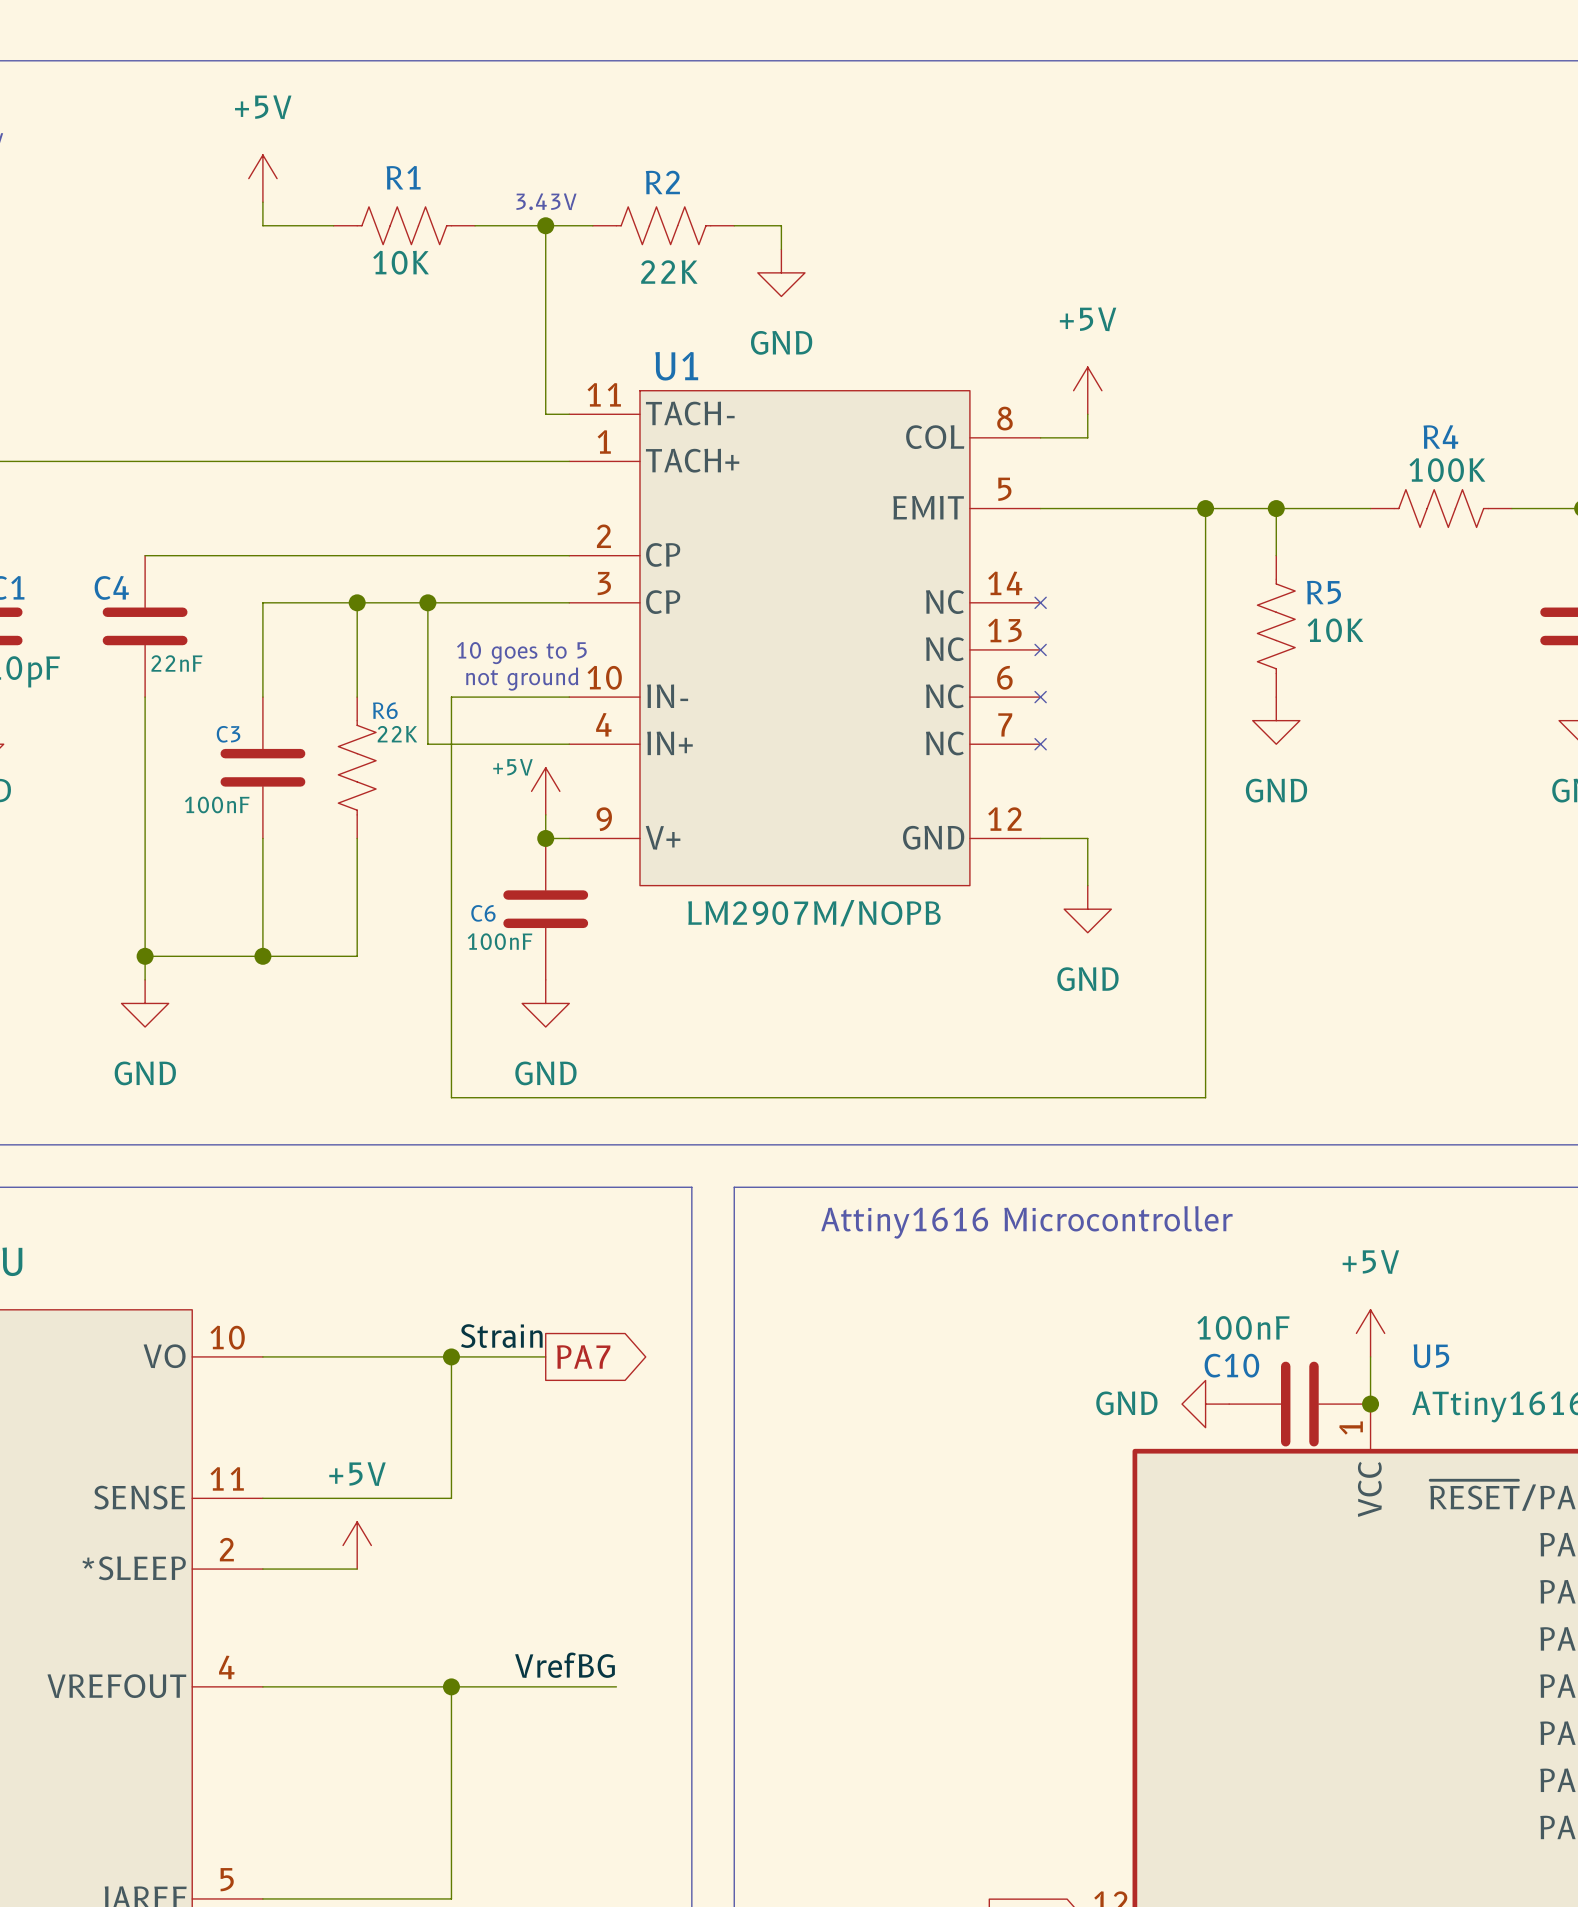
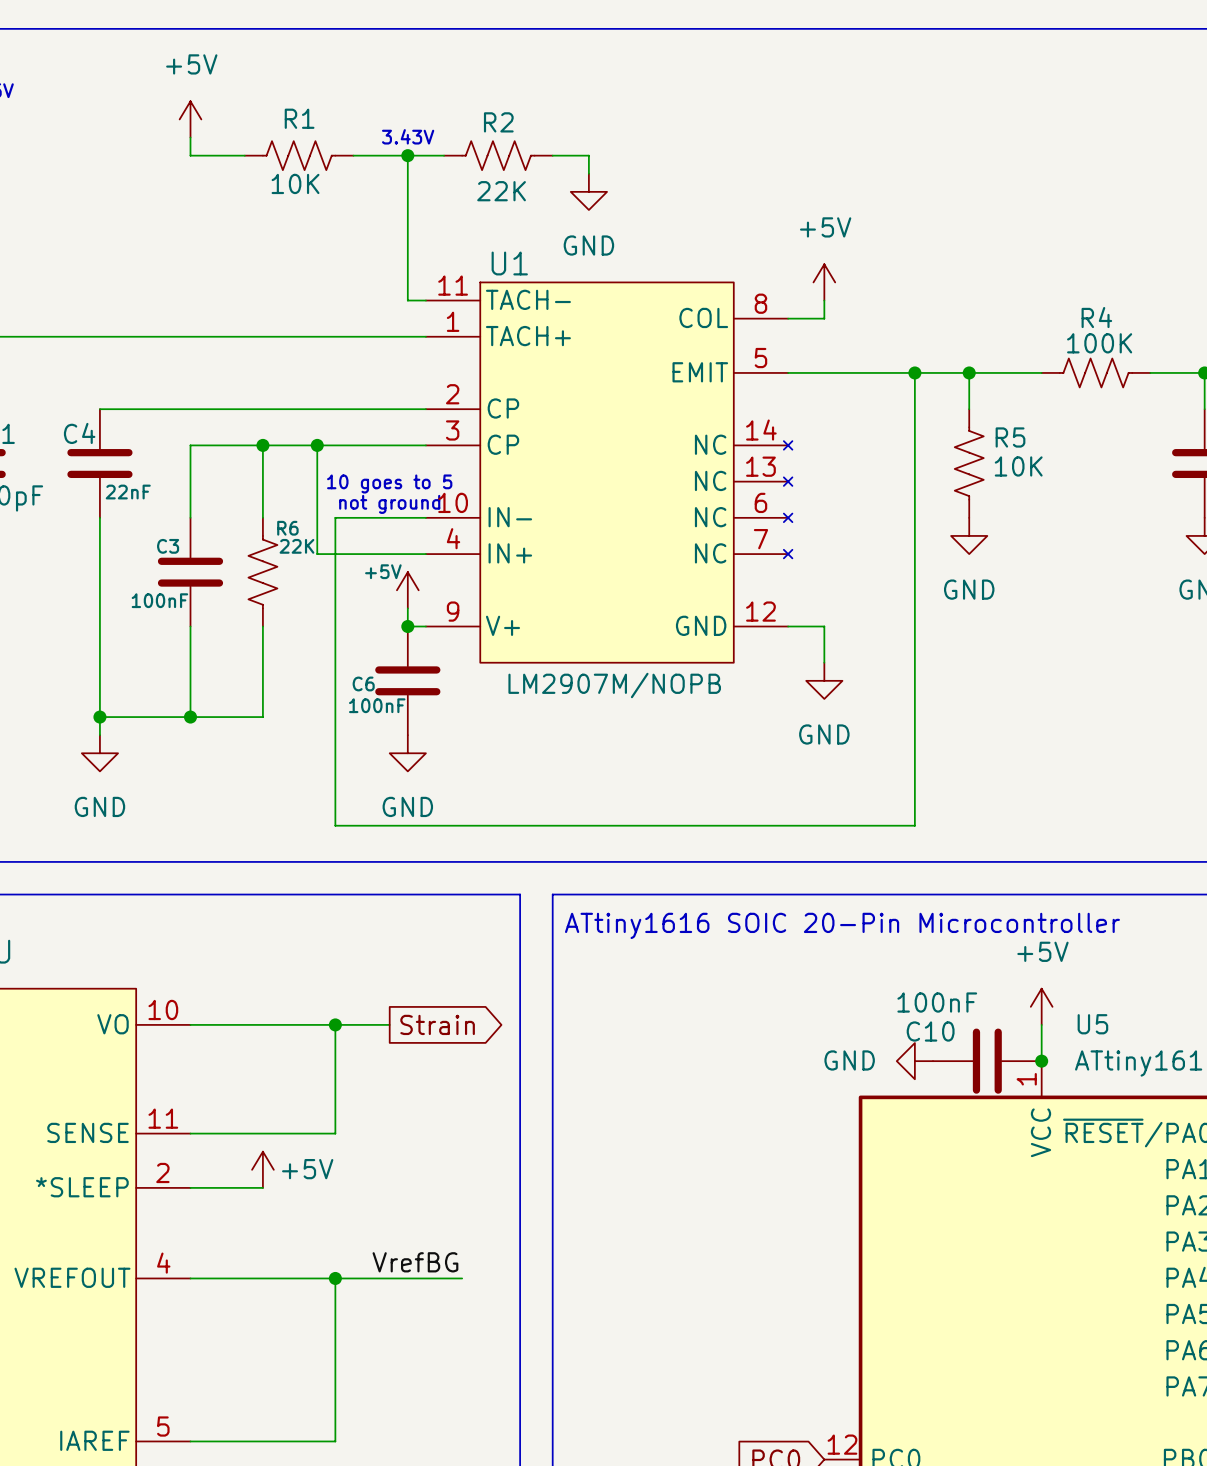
text: Attiny1616 Microcontroller (1026, 1222) -> ATtiny1616 SOIC 20-Pin Microcontroller (842, 925)
label: Strain (501, 1336) -> none
wire: (522, 1356) (545, 1356) -> none
global label: PA7 (583, 1356) -> none
global label: none -> Strain (437, 1024)
power symbol text position: +5V (357, 1474) -> +5V (307, 1169)

